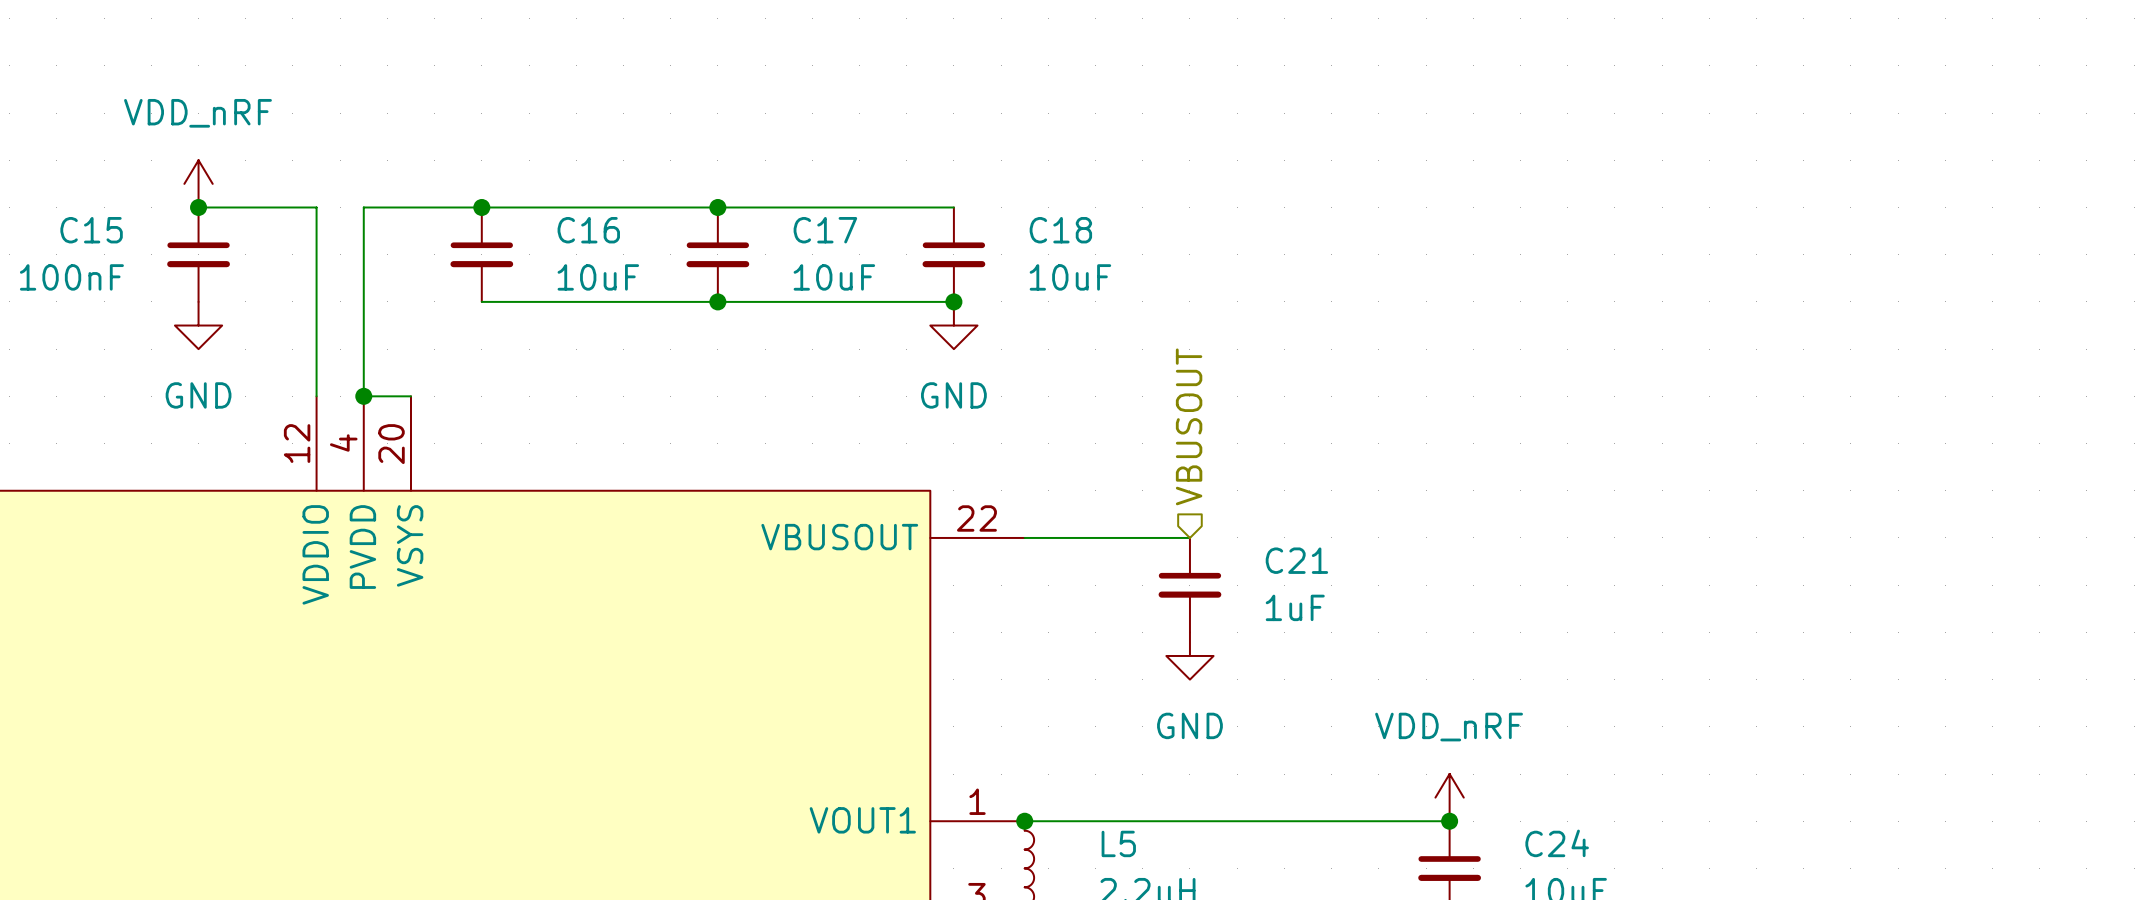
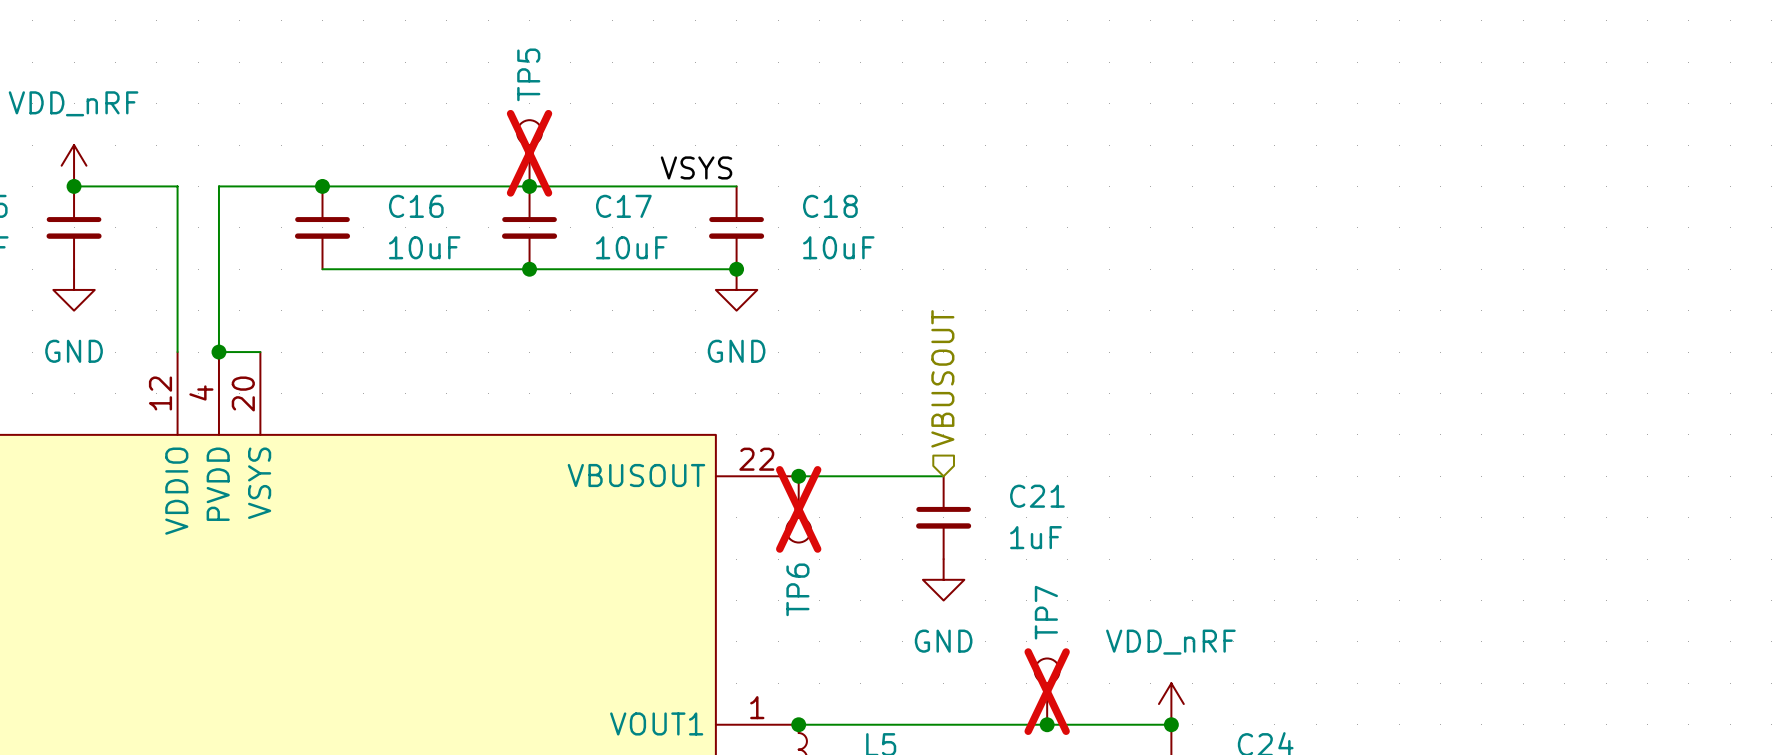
TP5: none -> (529, 153)
label: none -> VSYS (696, 167)
junction: none -> (798, 476)
TP6: none -> (798, 509)
TP7: none -> (1047, 691)
junction: none -> (1047, 724)

